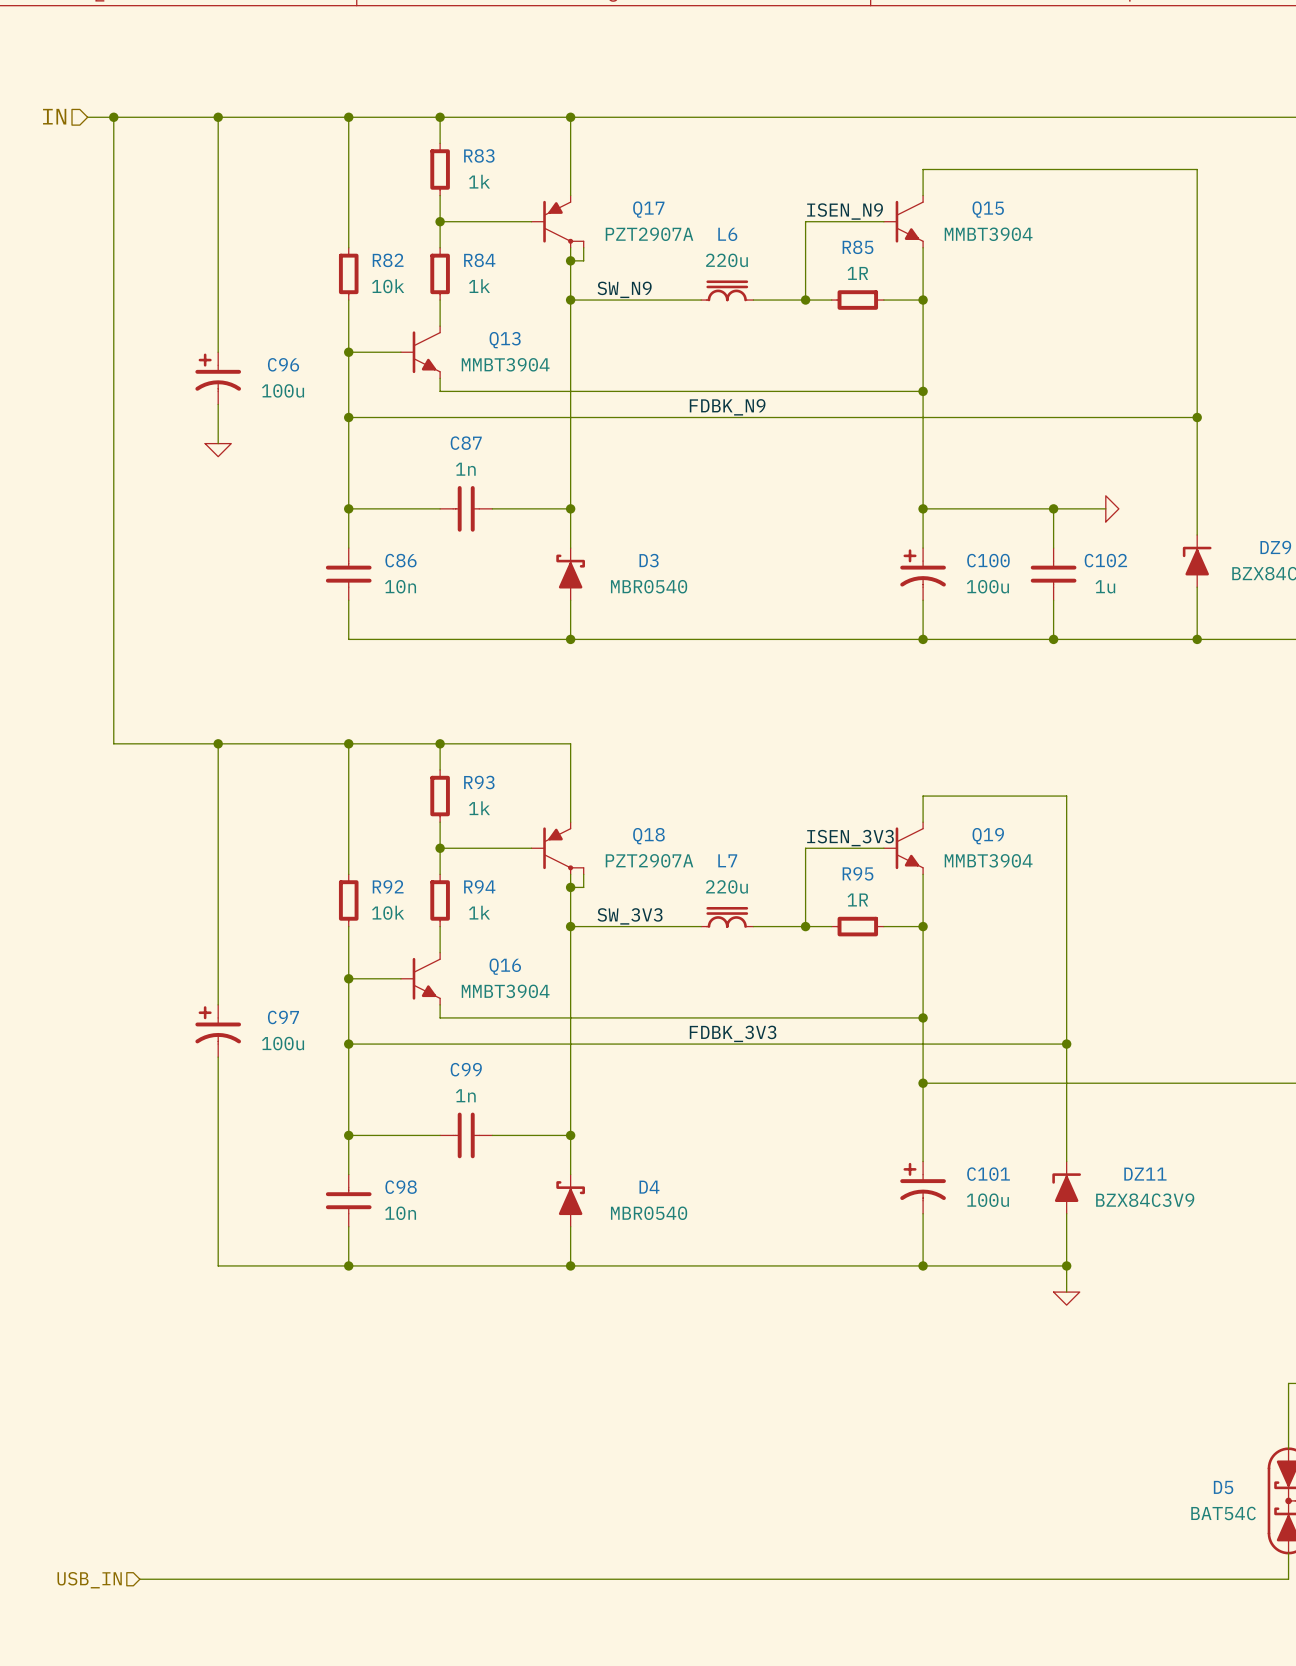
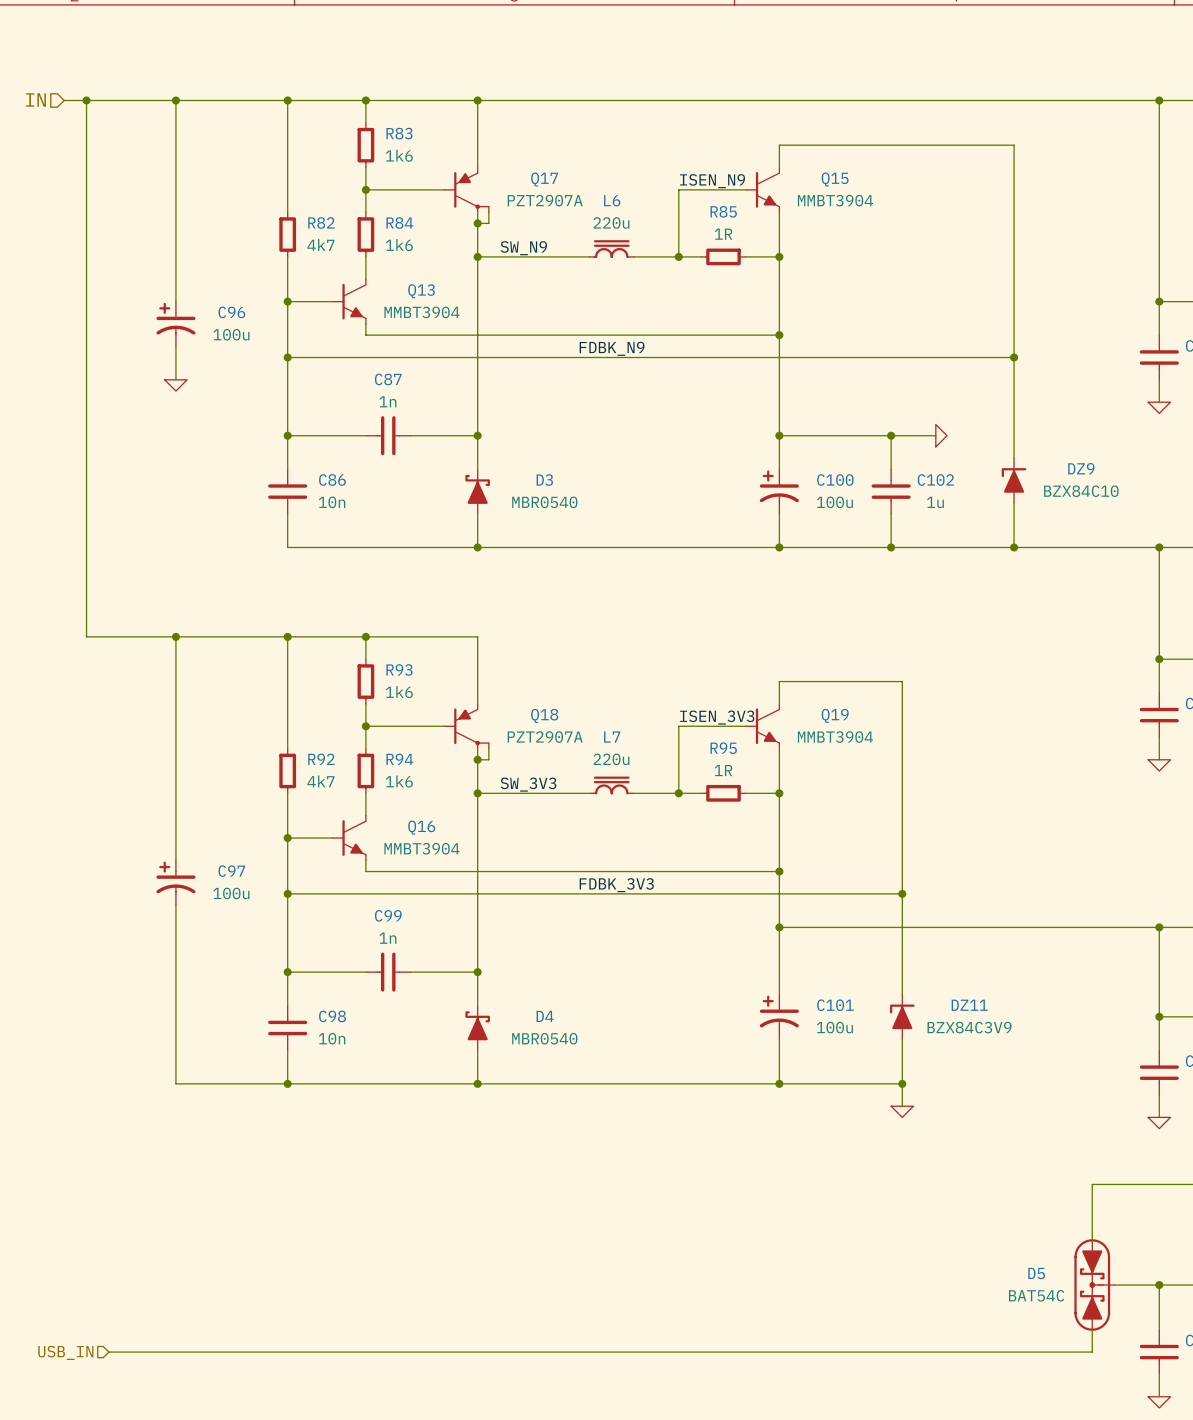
R83 value: 1k (479, 181) -> 1k6 (399, 155)
R82 value: 10k (388, 286) -> 4k7 (320, 245)
R84 value: 1k (479, 286) -> 1k6 (399, 245)
R93 value: 1k (479, 808) -> 1k6 (399, 692)
R92 value: 10k (388, 912) -> 4k7 (320, 781)
R94 value: 1k (479, 912) -> 1k6 (399, 781)

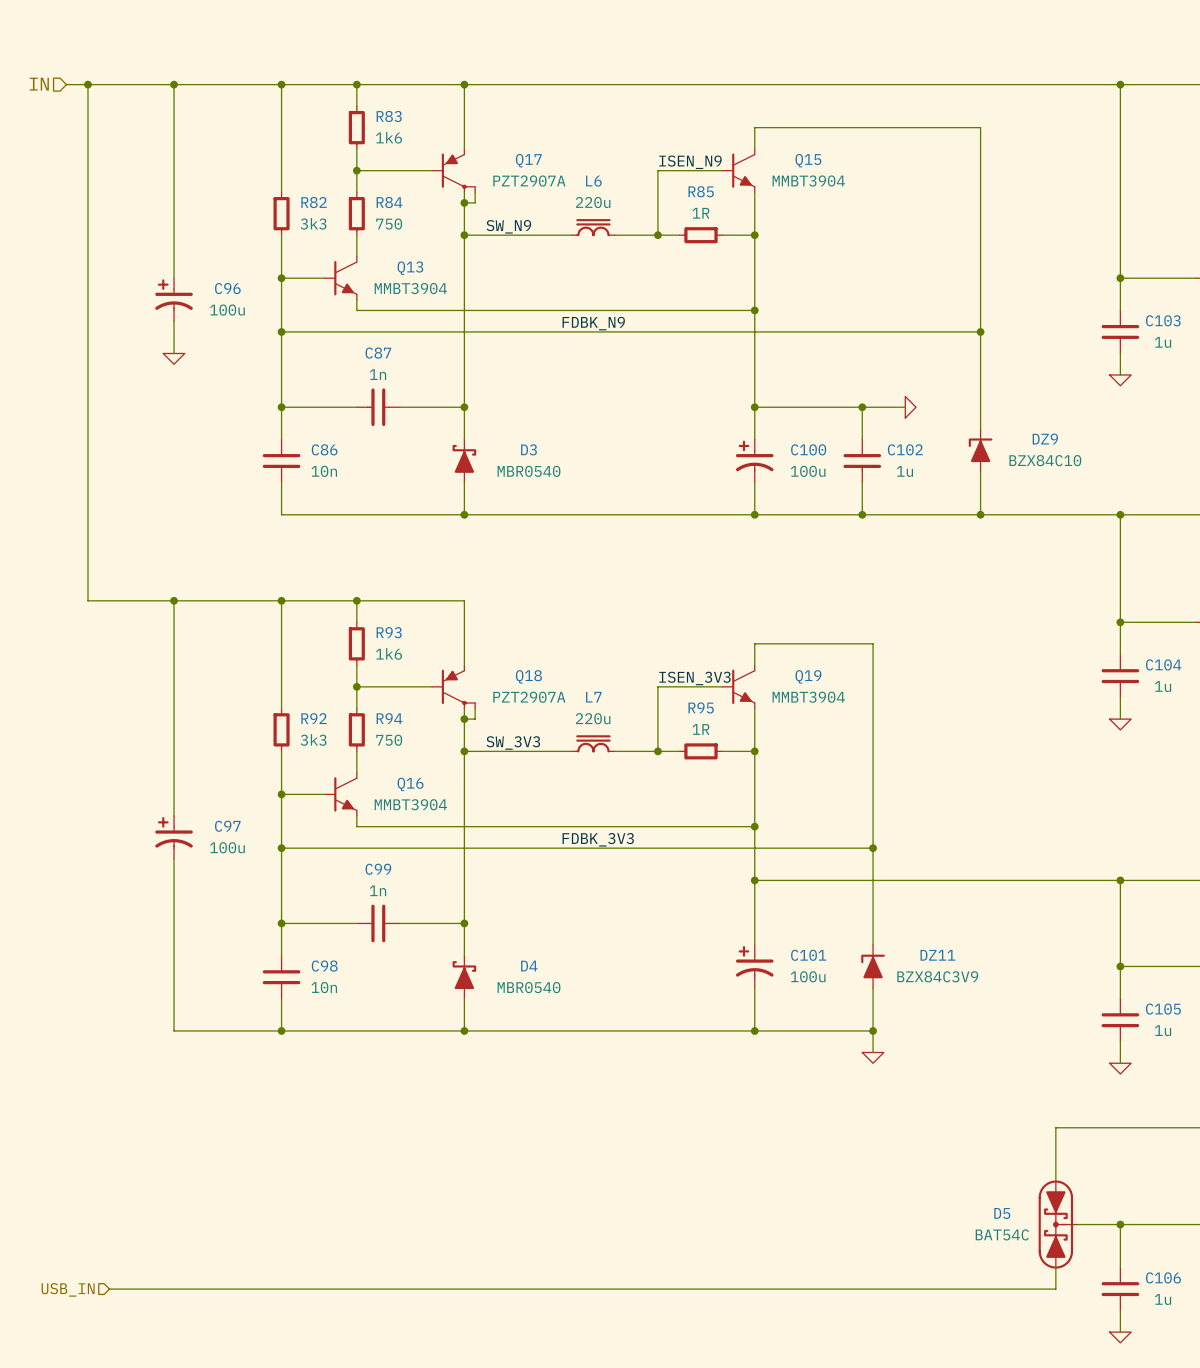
R82 value: 4k7 (320, 245) -> 3k3 (313, 223)
R84 value: 1k6 (399, 245) -> 750 (389, 224)
R92 value: 4k7 (320, 781) -> 3k3 (313, 739)
R94 value: 1k6 (399, 781) -> 750 (389, 740)

